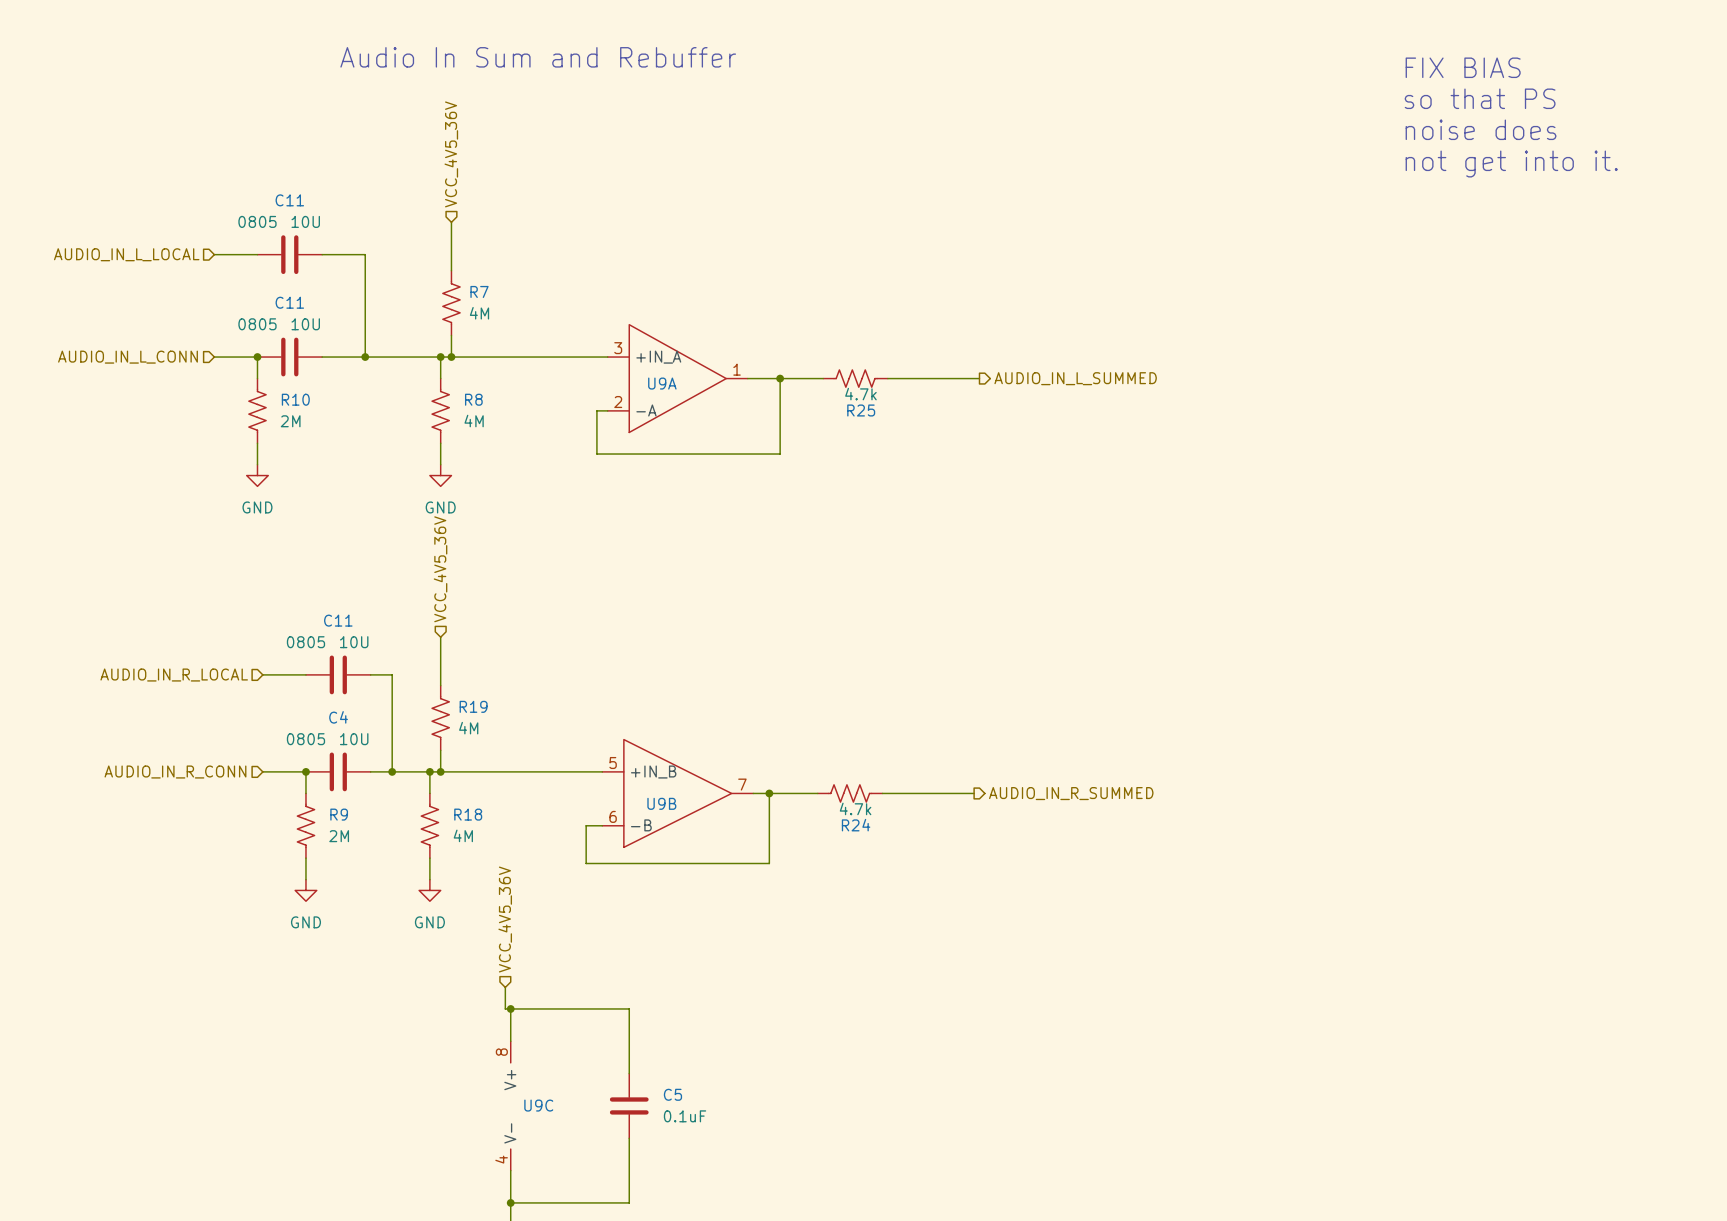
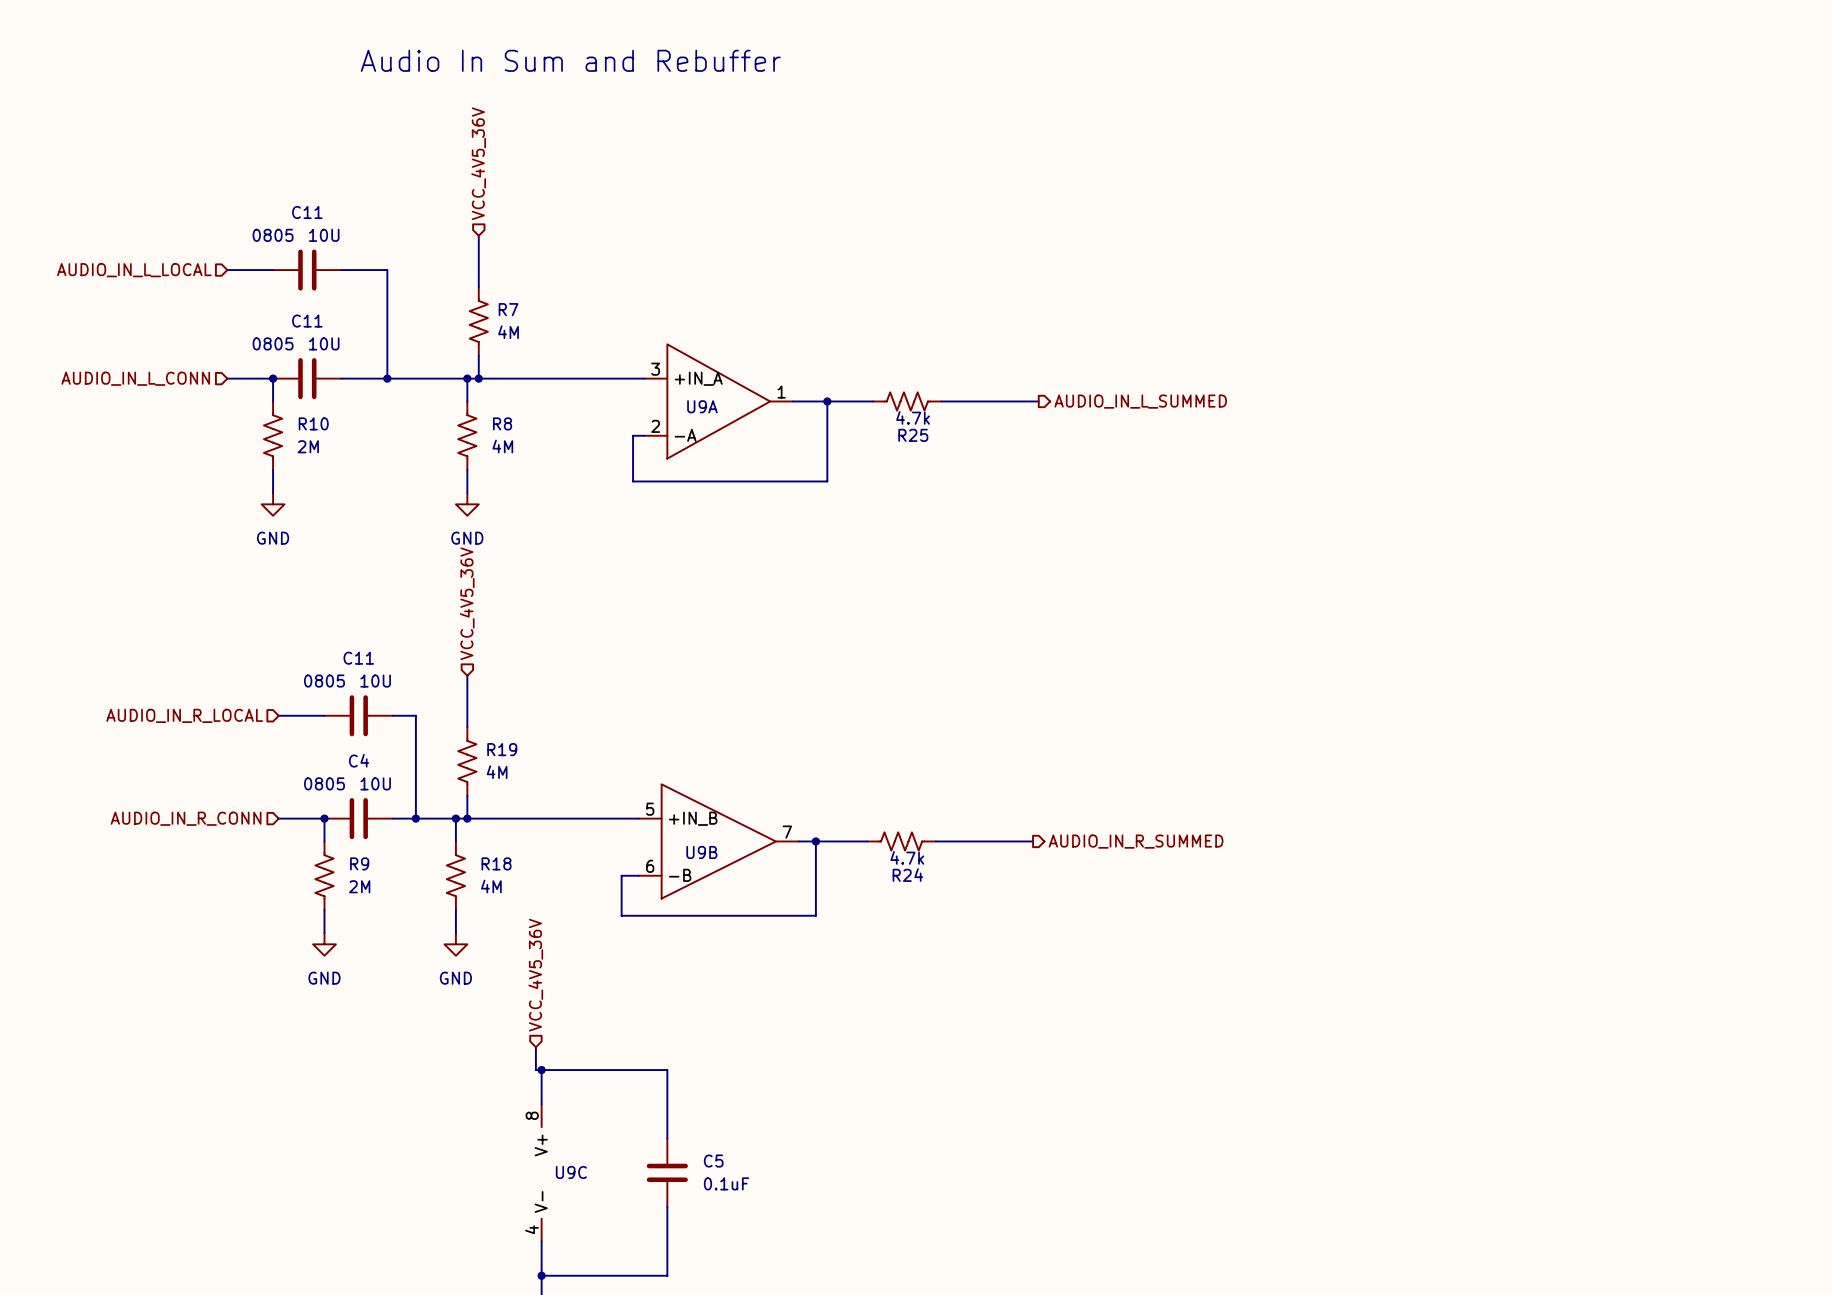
text: FIX BIAS (1463, 67) -> none
text: so that PS (1480, 98) -> none
text: noise does (1481, 129) -> none
text: not get into it. (1511, 164) -> none

